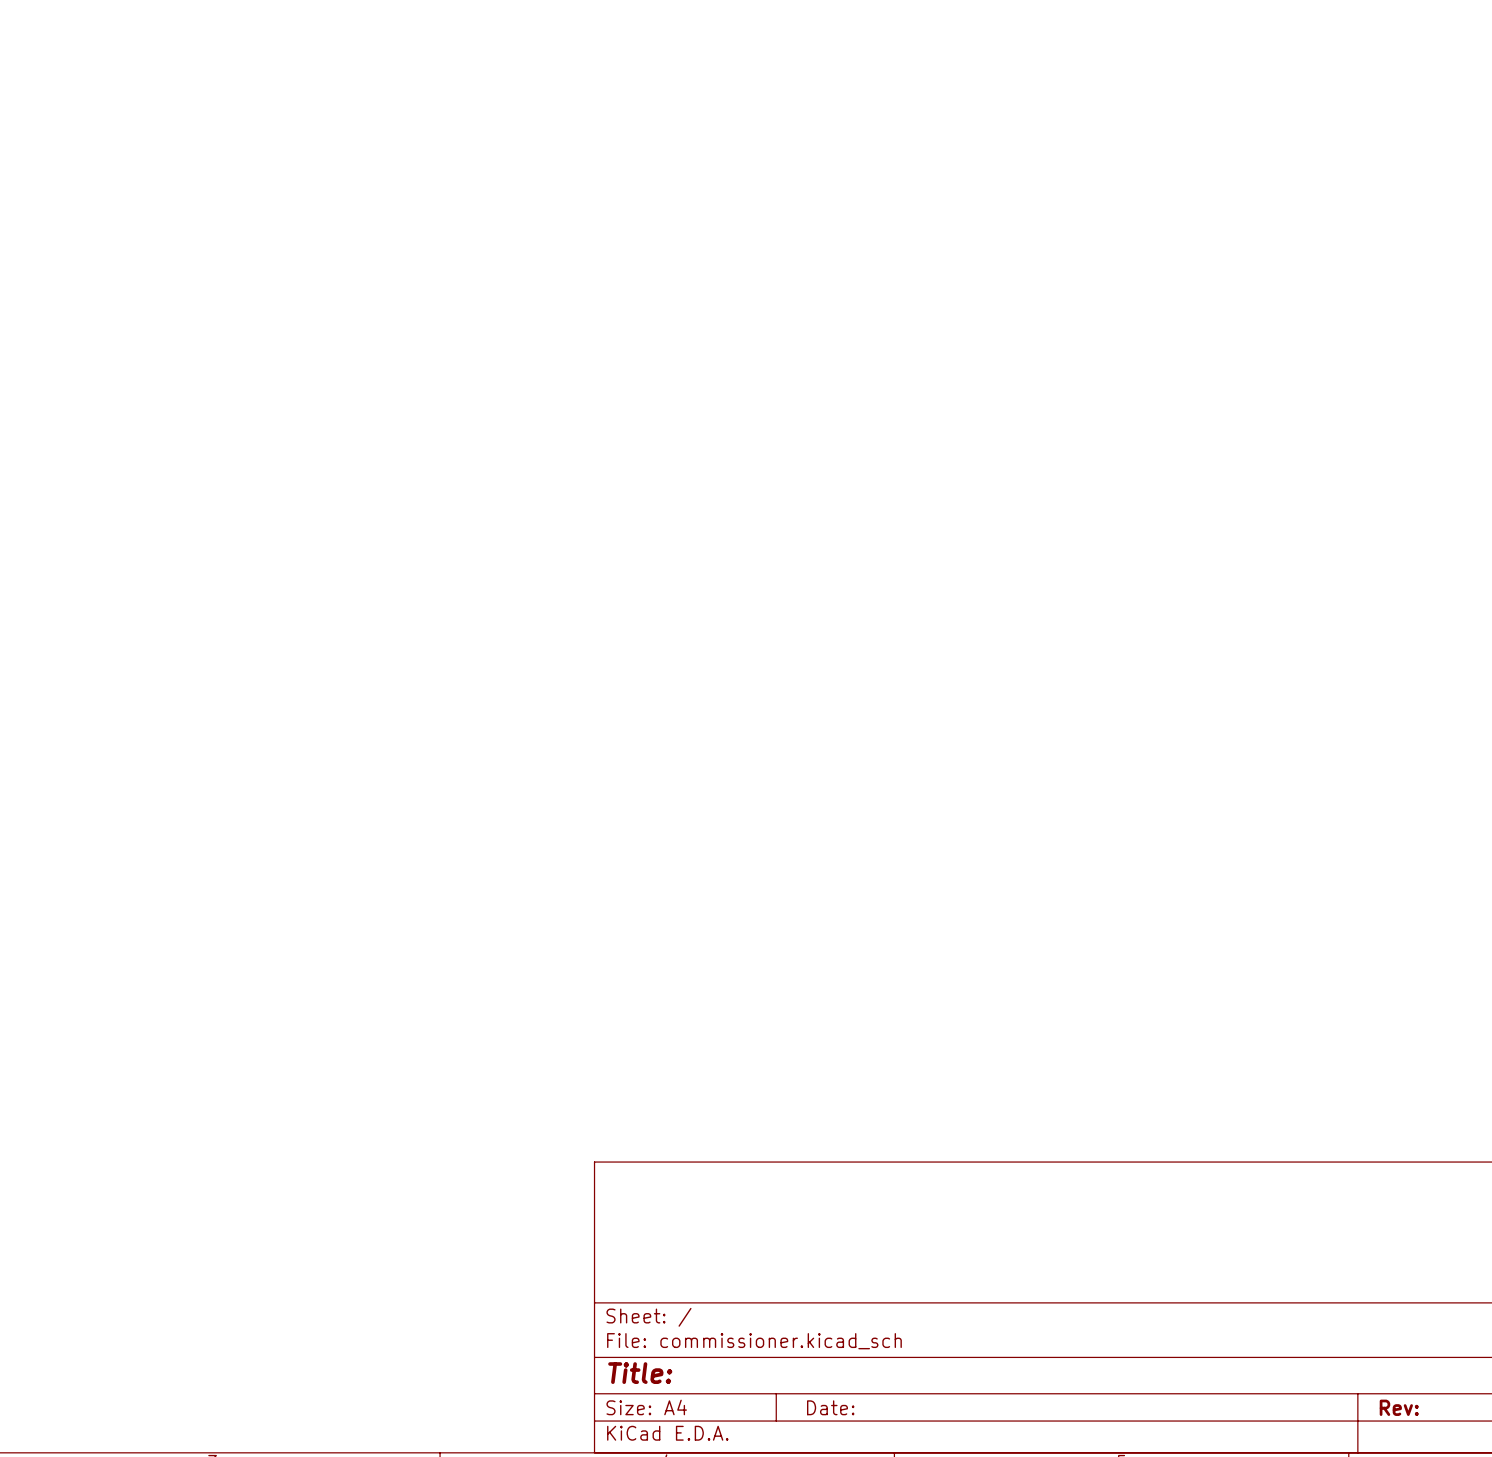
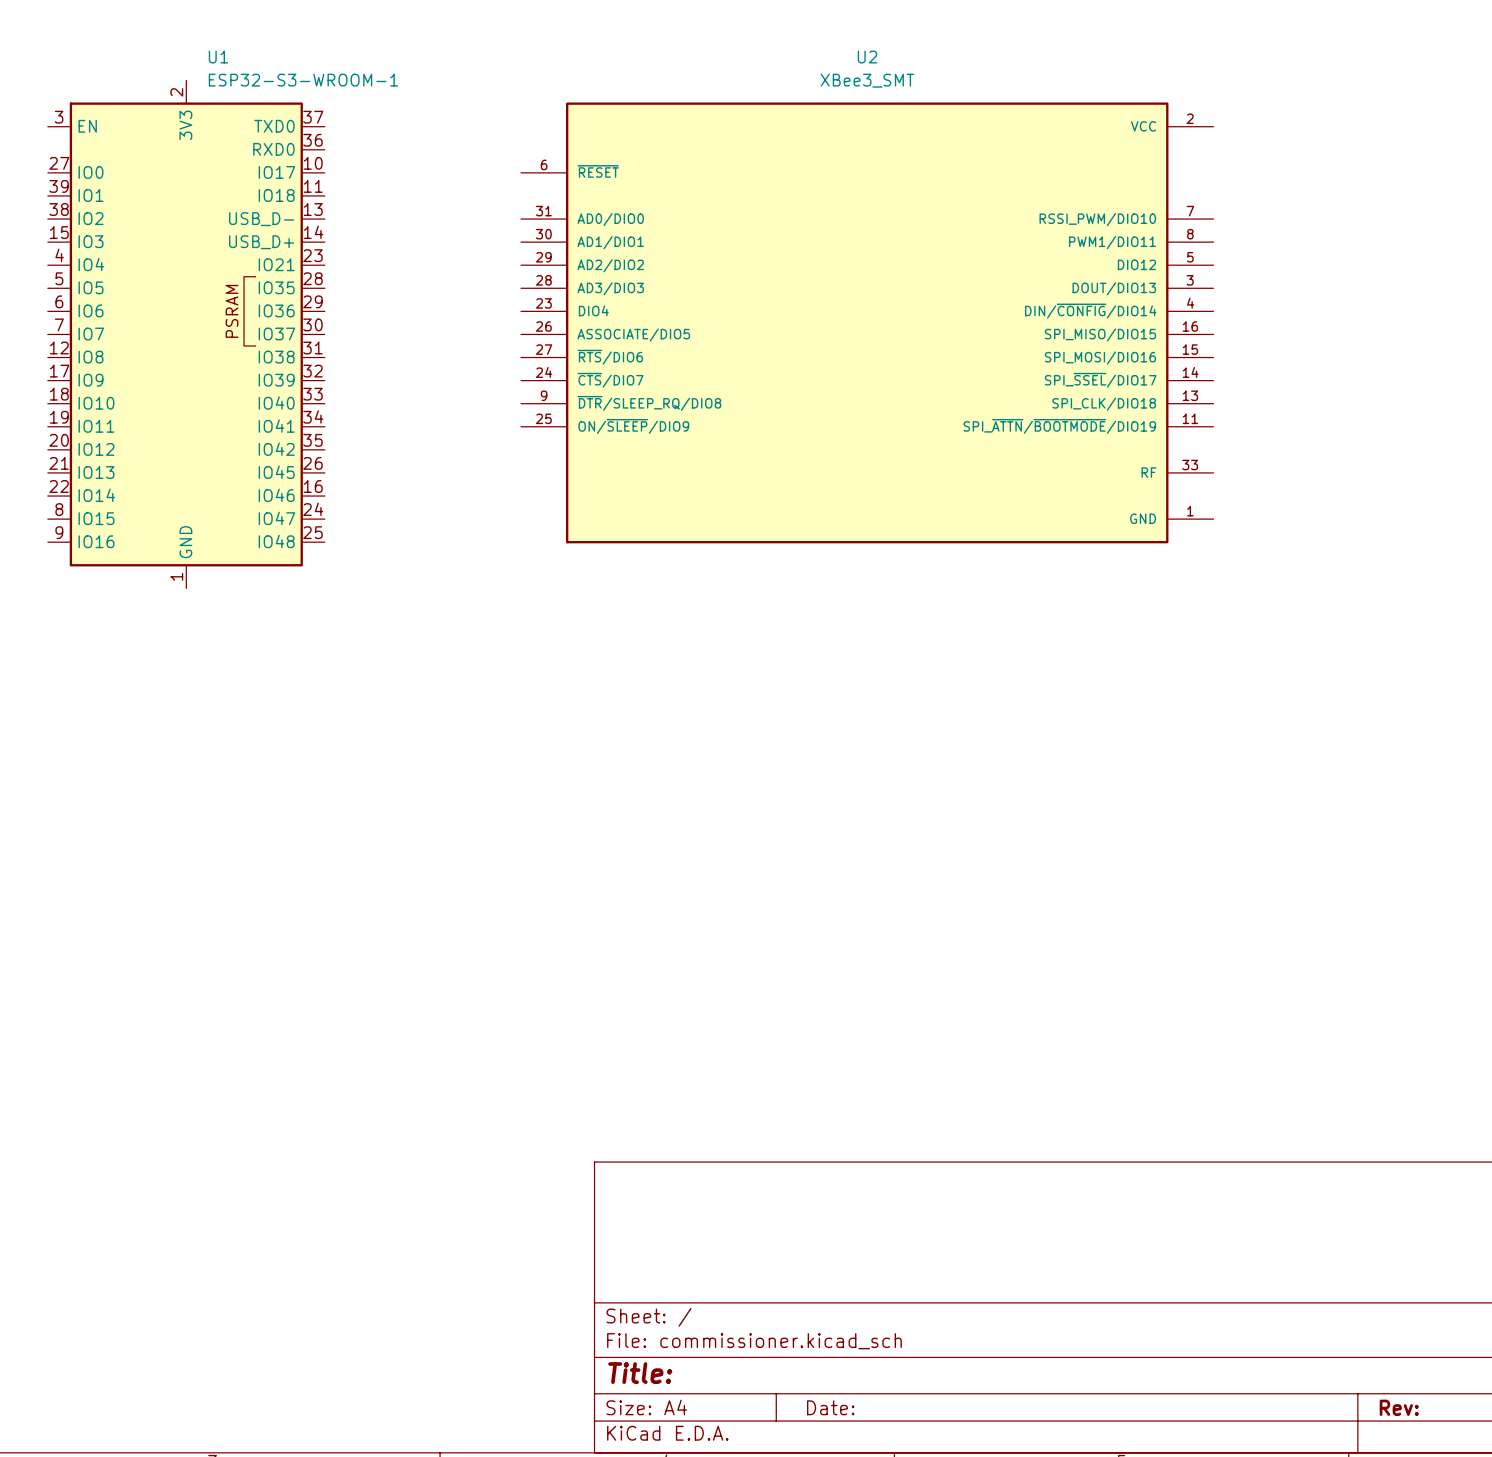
U2: none -> XBee3_SMT (867, 322)
U1: none -> ESP32-S3-WROOM-1 (186, 334)

